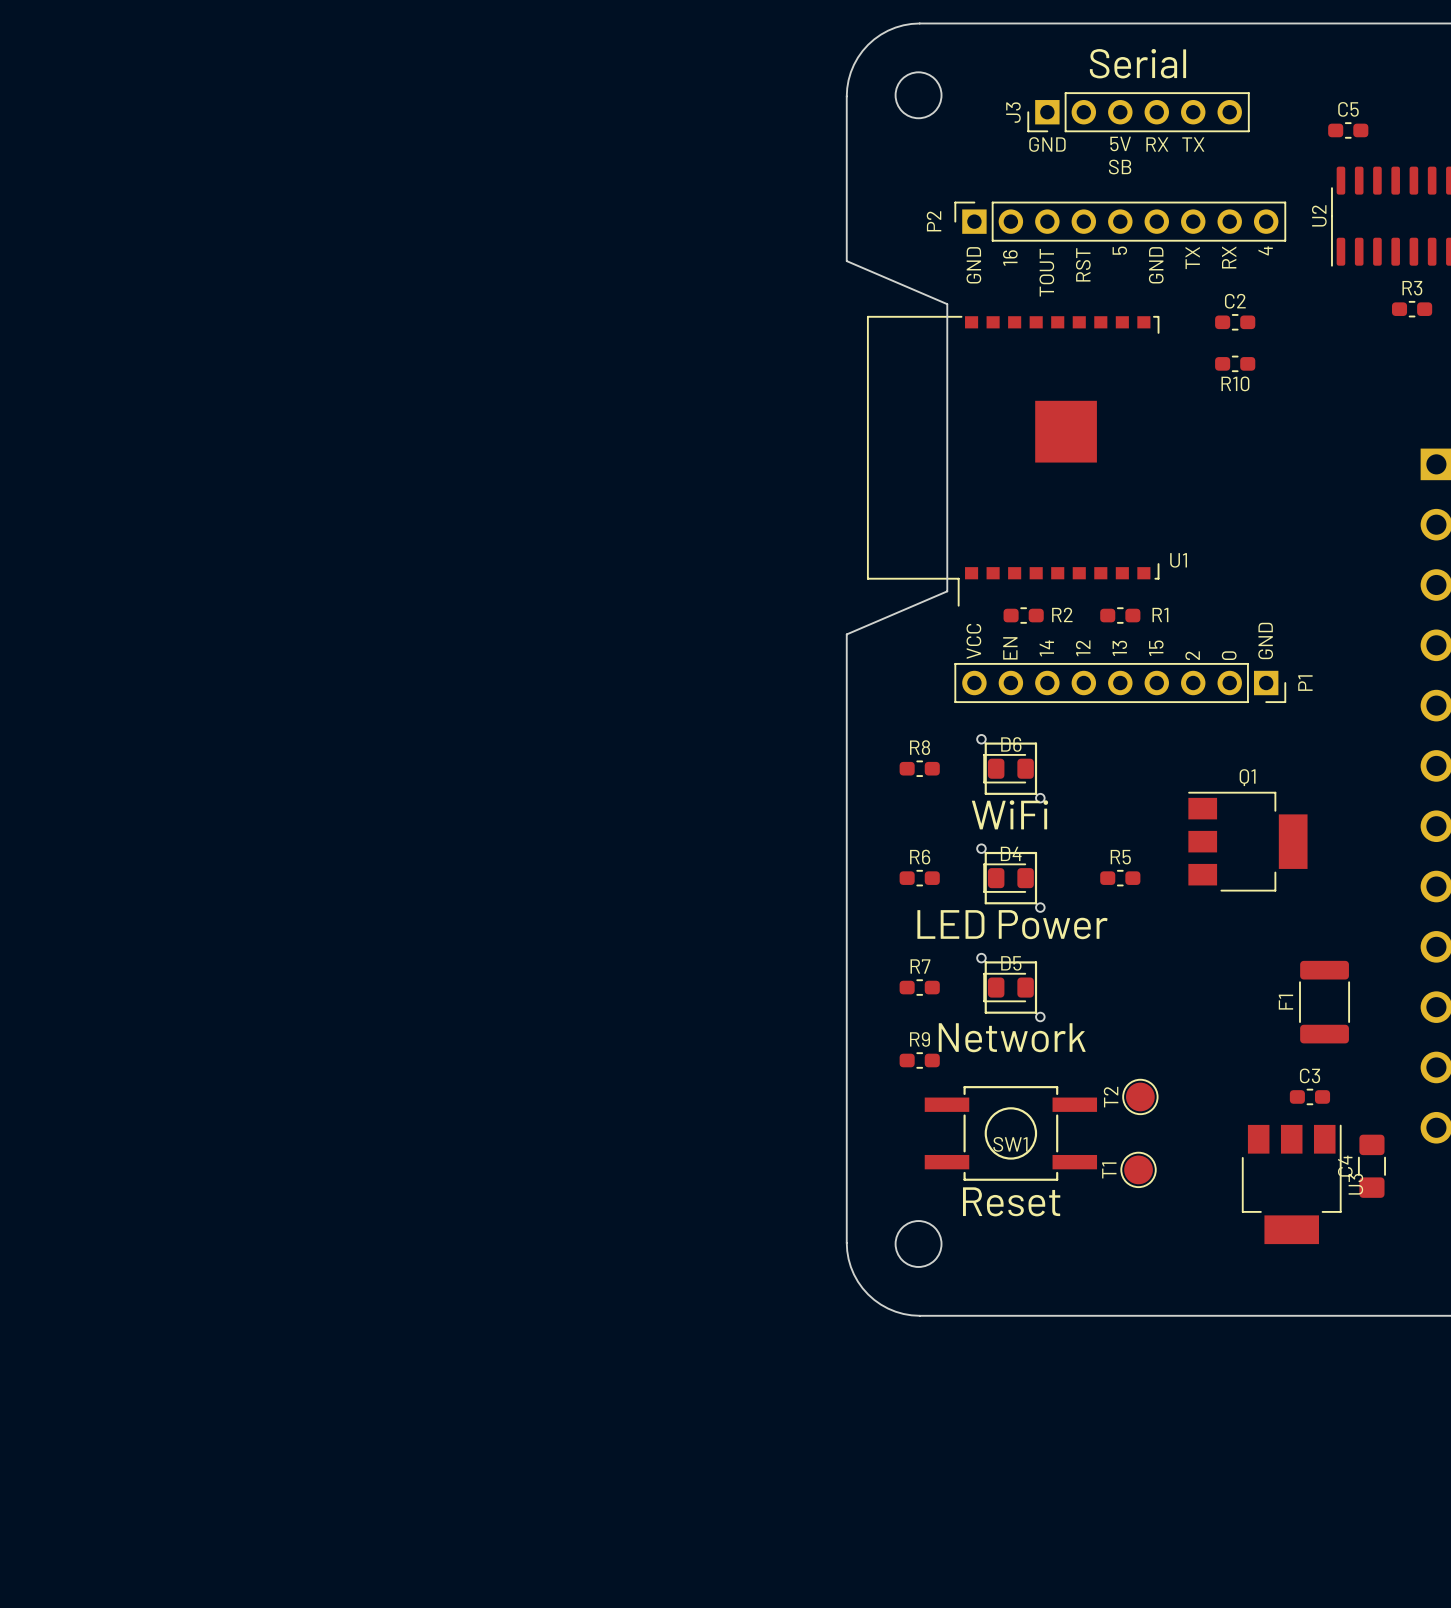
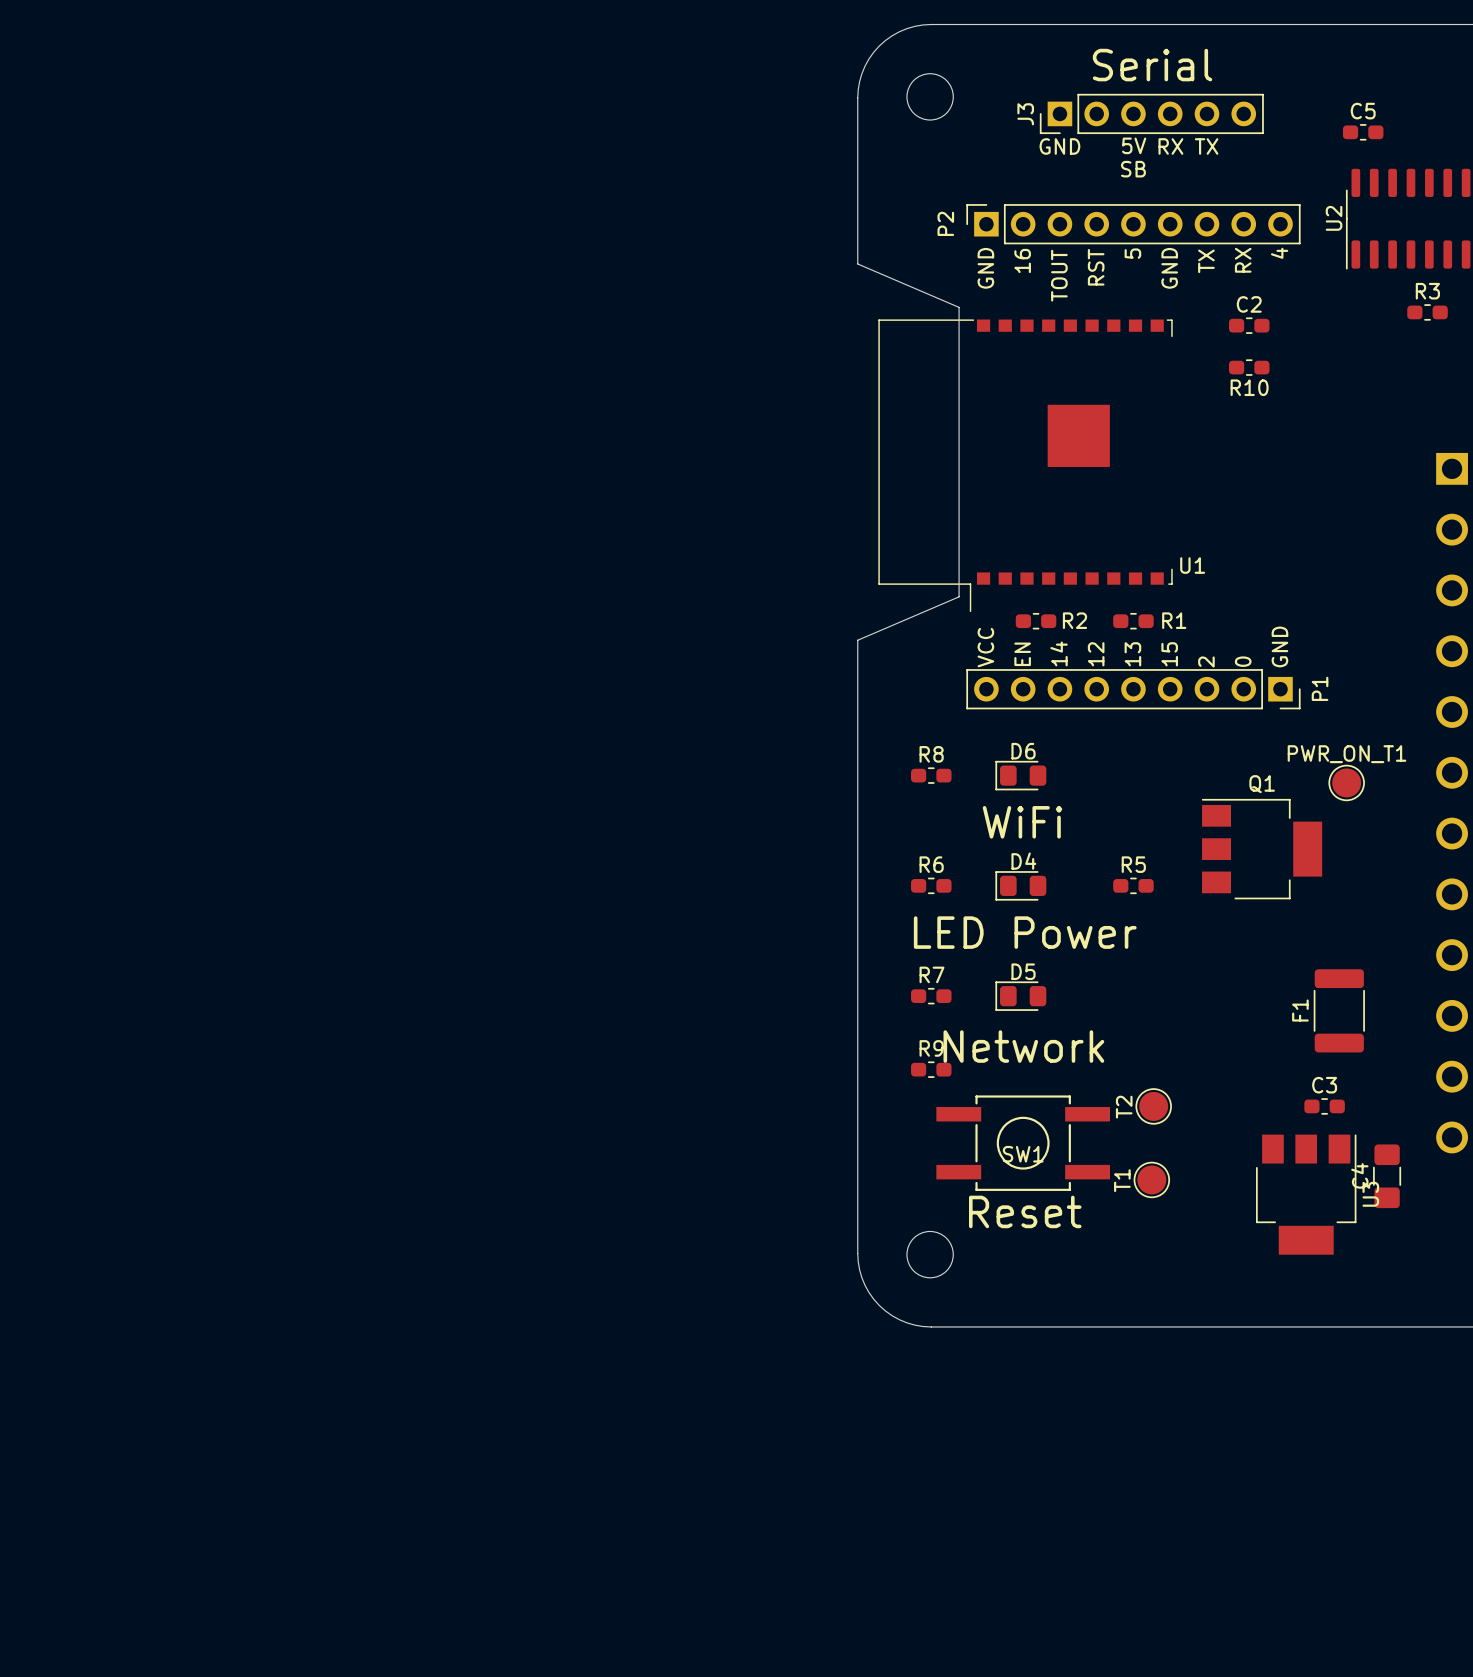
part: (1010, 768) -> none
PWR_ON_T1: none -> (1346, 782)
part: (1010, 878) -> none
part: (1010, 987) -> none

